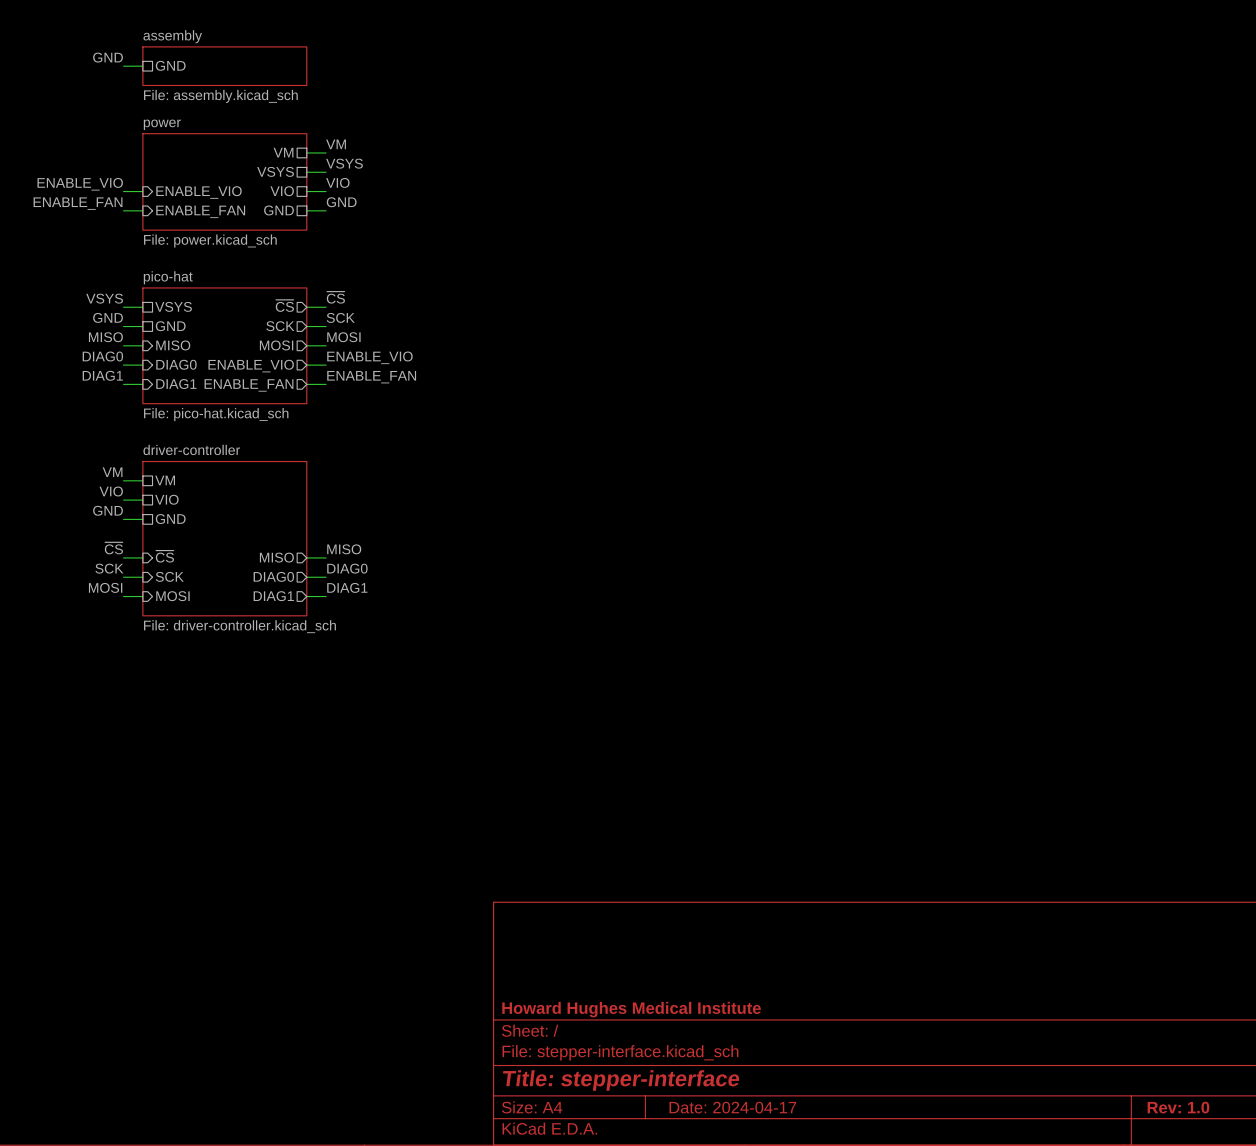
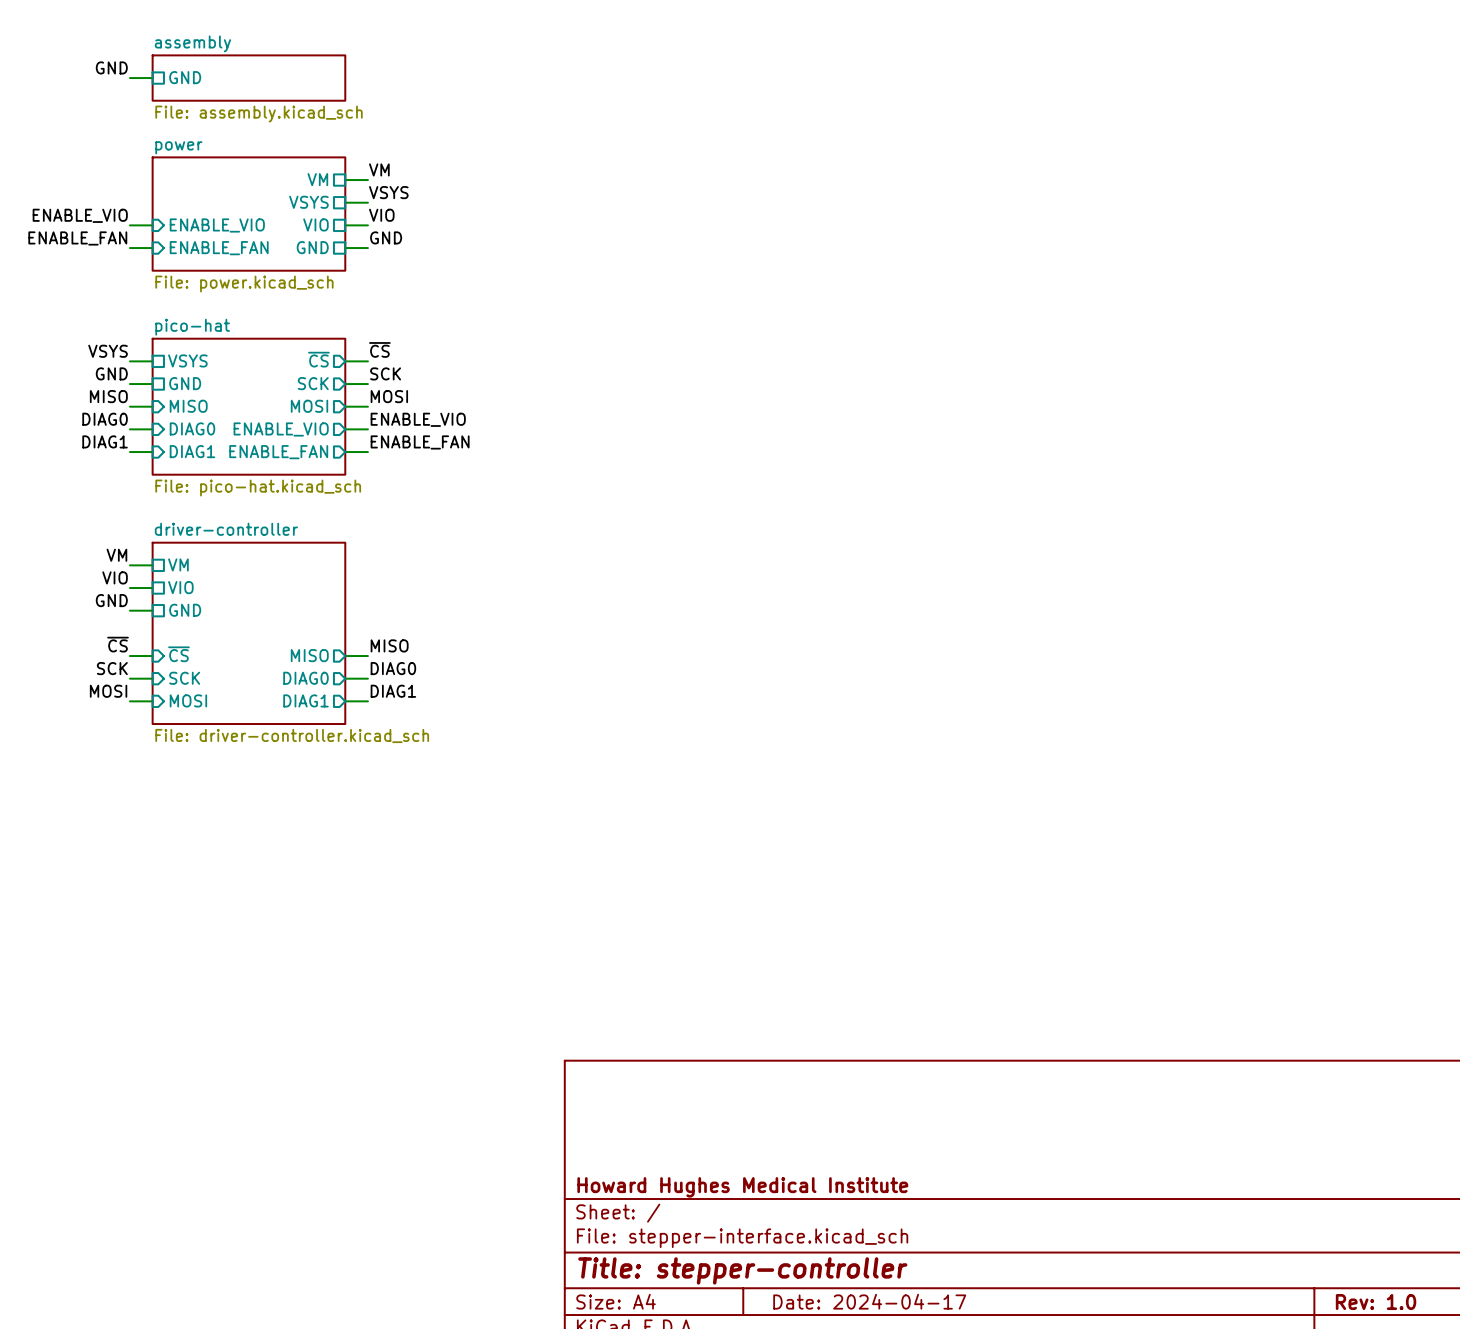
title block: Title: stepper-interface (621, 1080) -> Title: stepper-controller (742, 1270)

